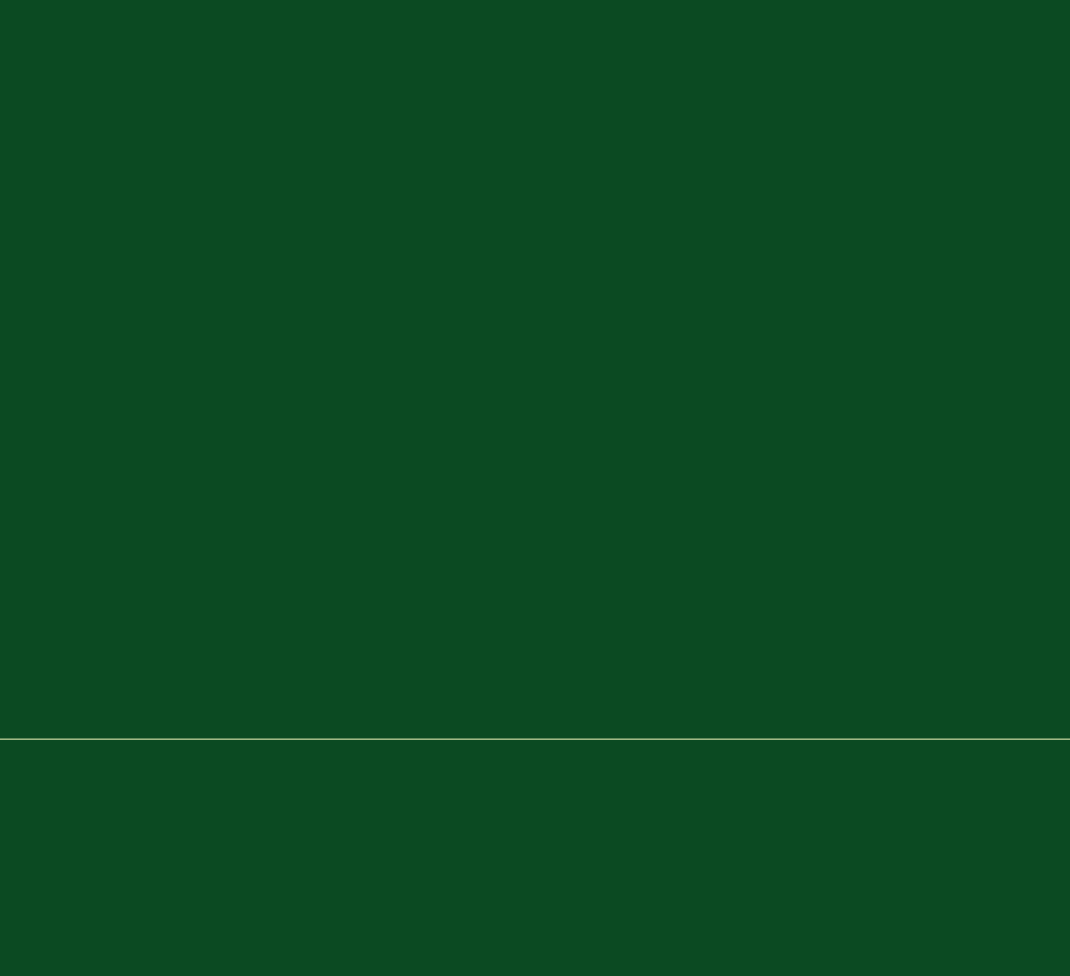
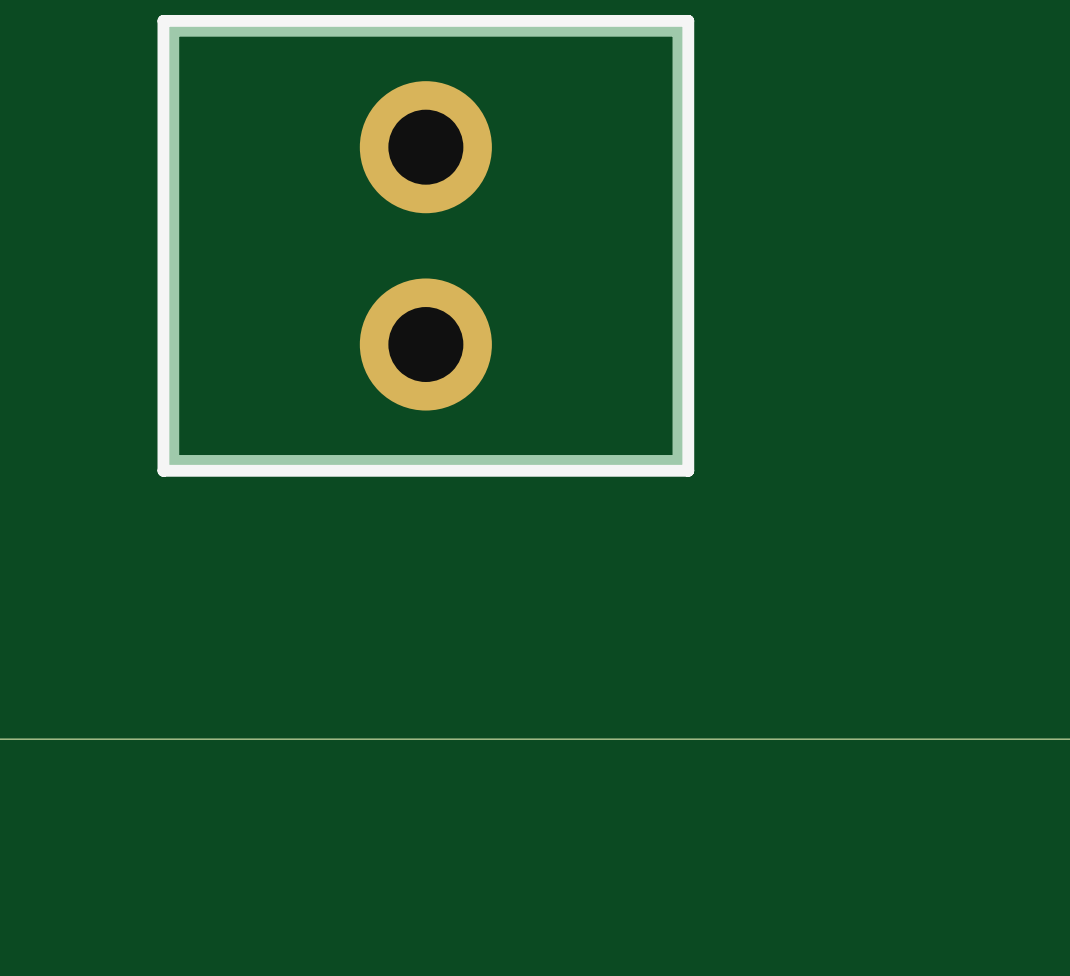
part: none -> (425, 245)

